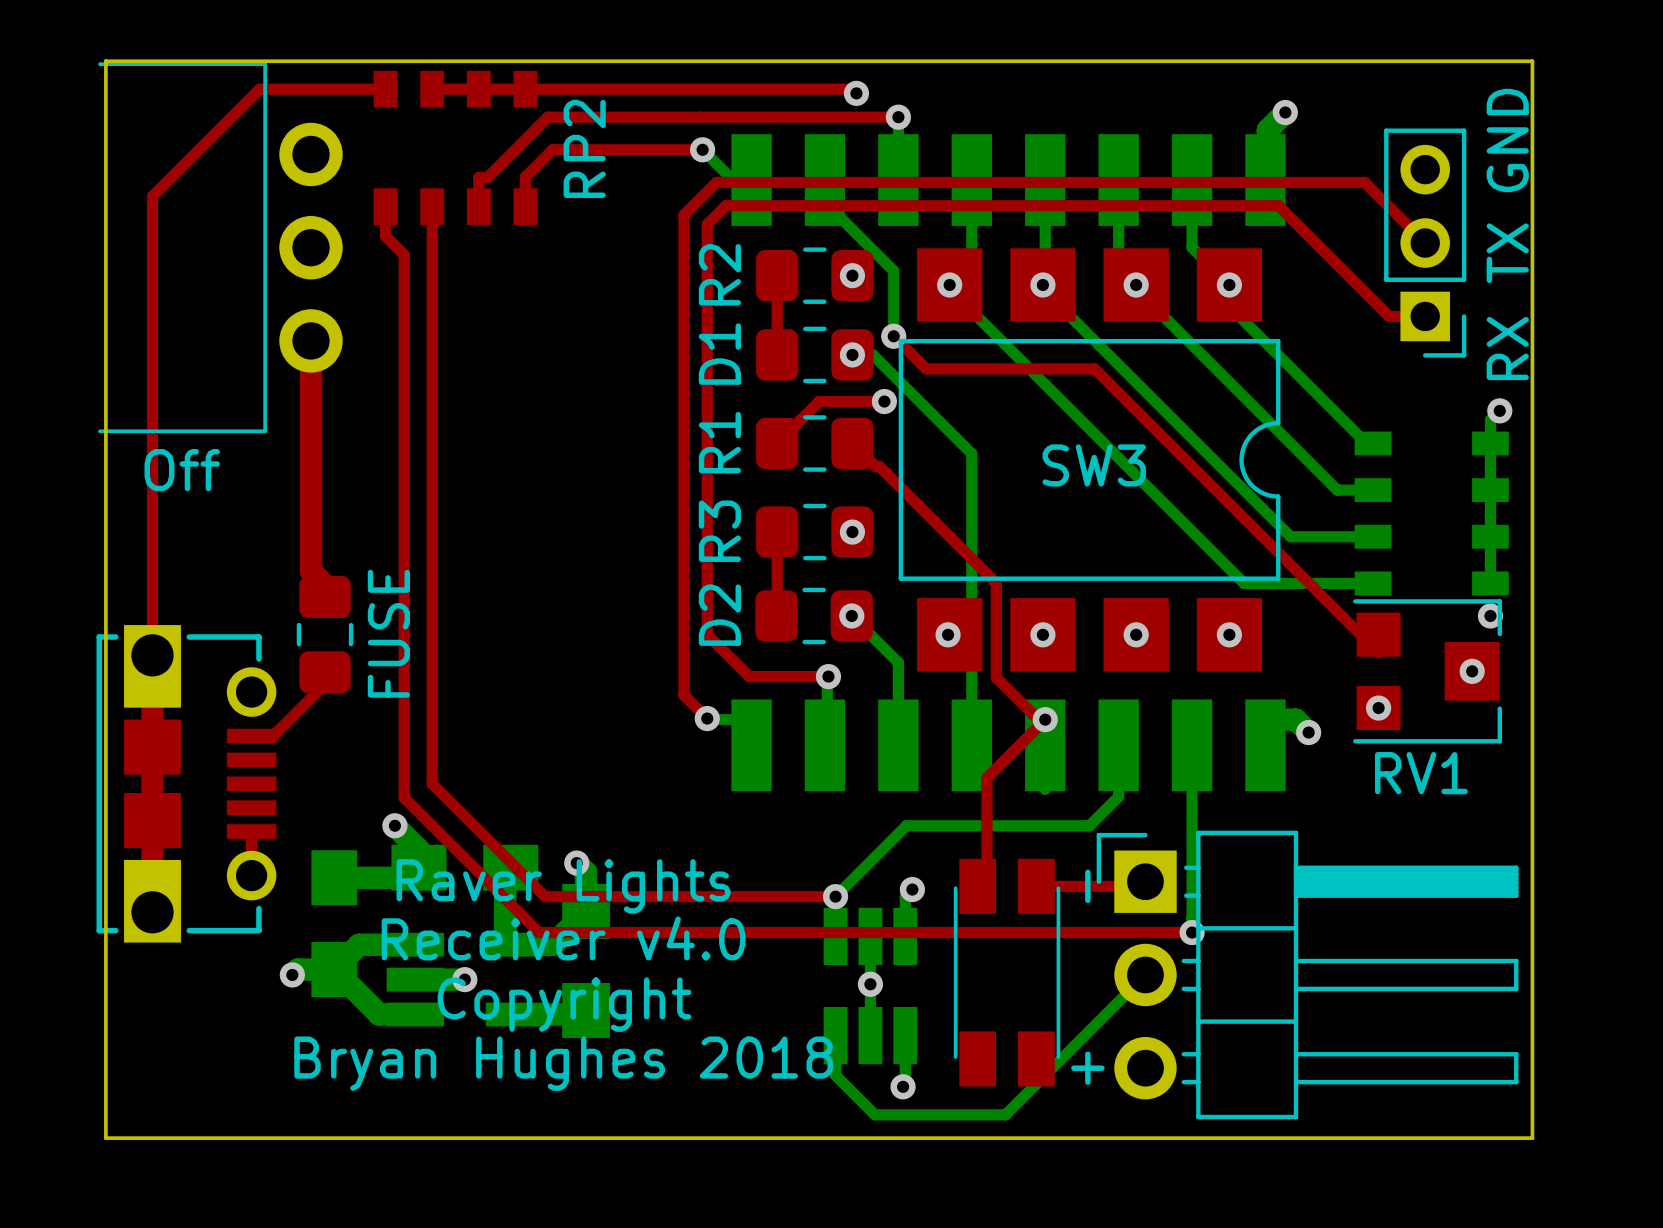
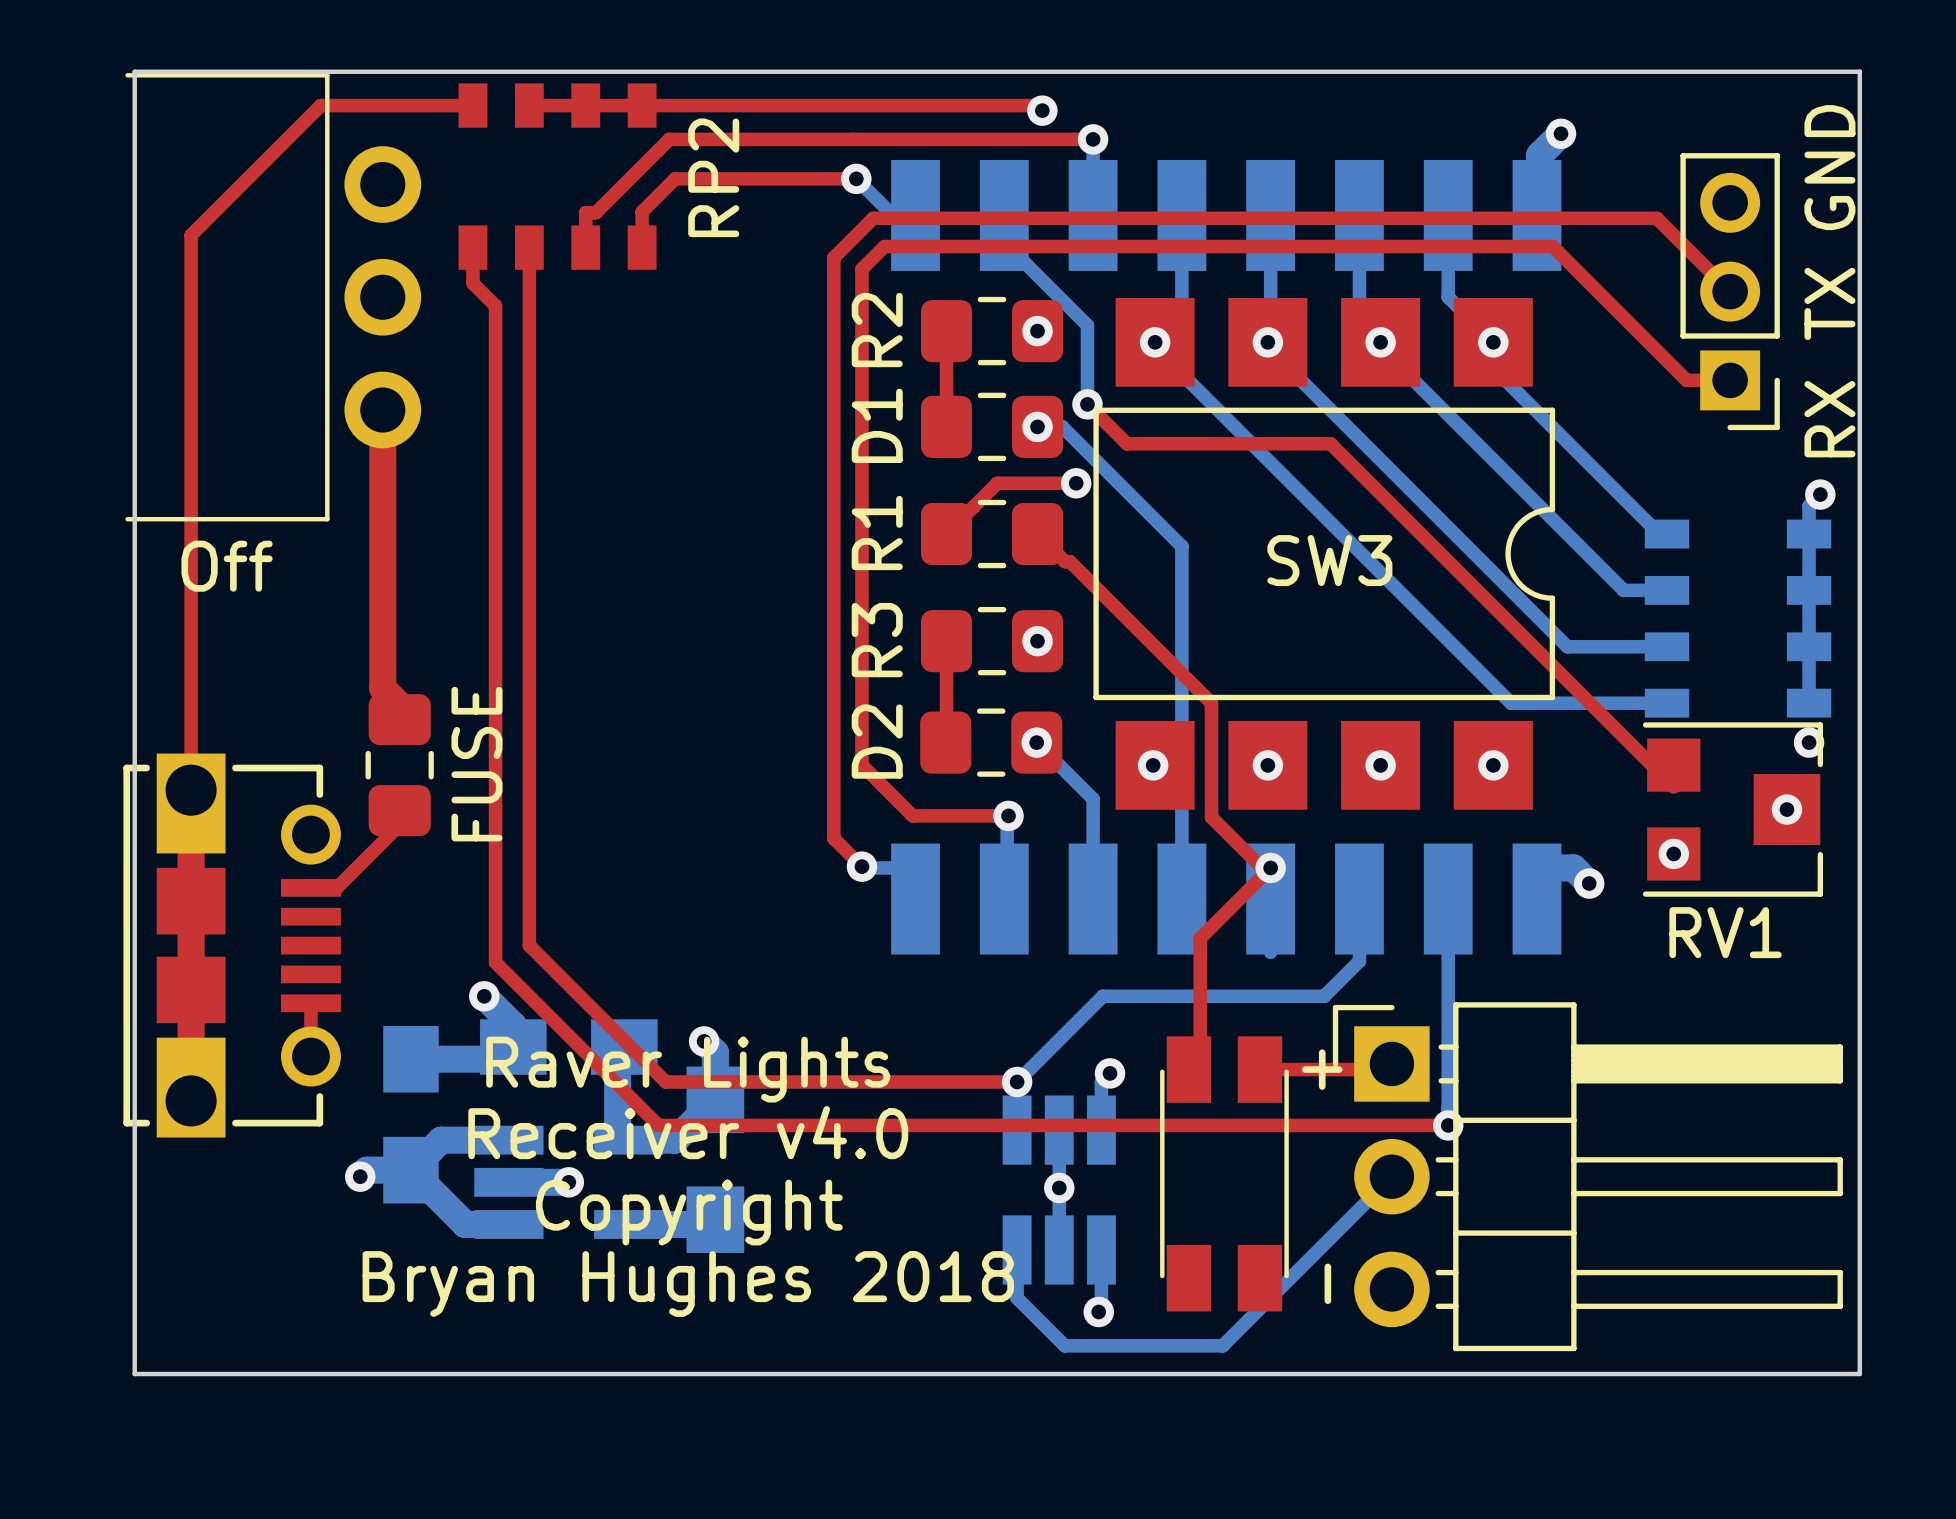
text: - (1087, 886) -> + (1322, 1069)
text: + (1087, 1068) -> - (1327, 1283)

